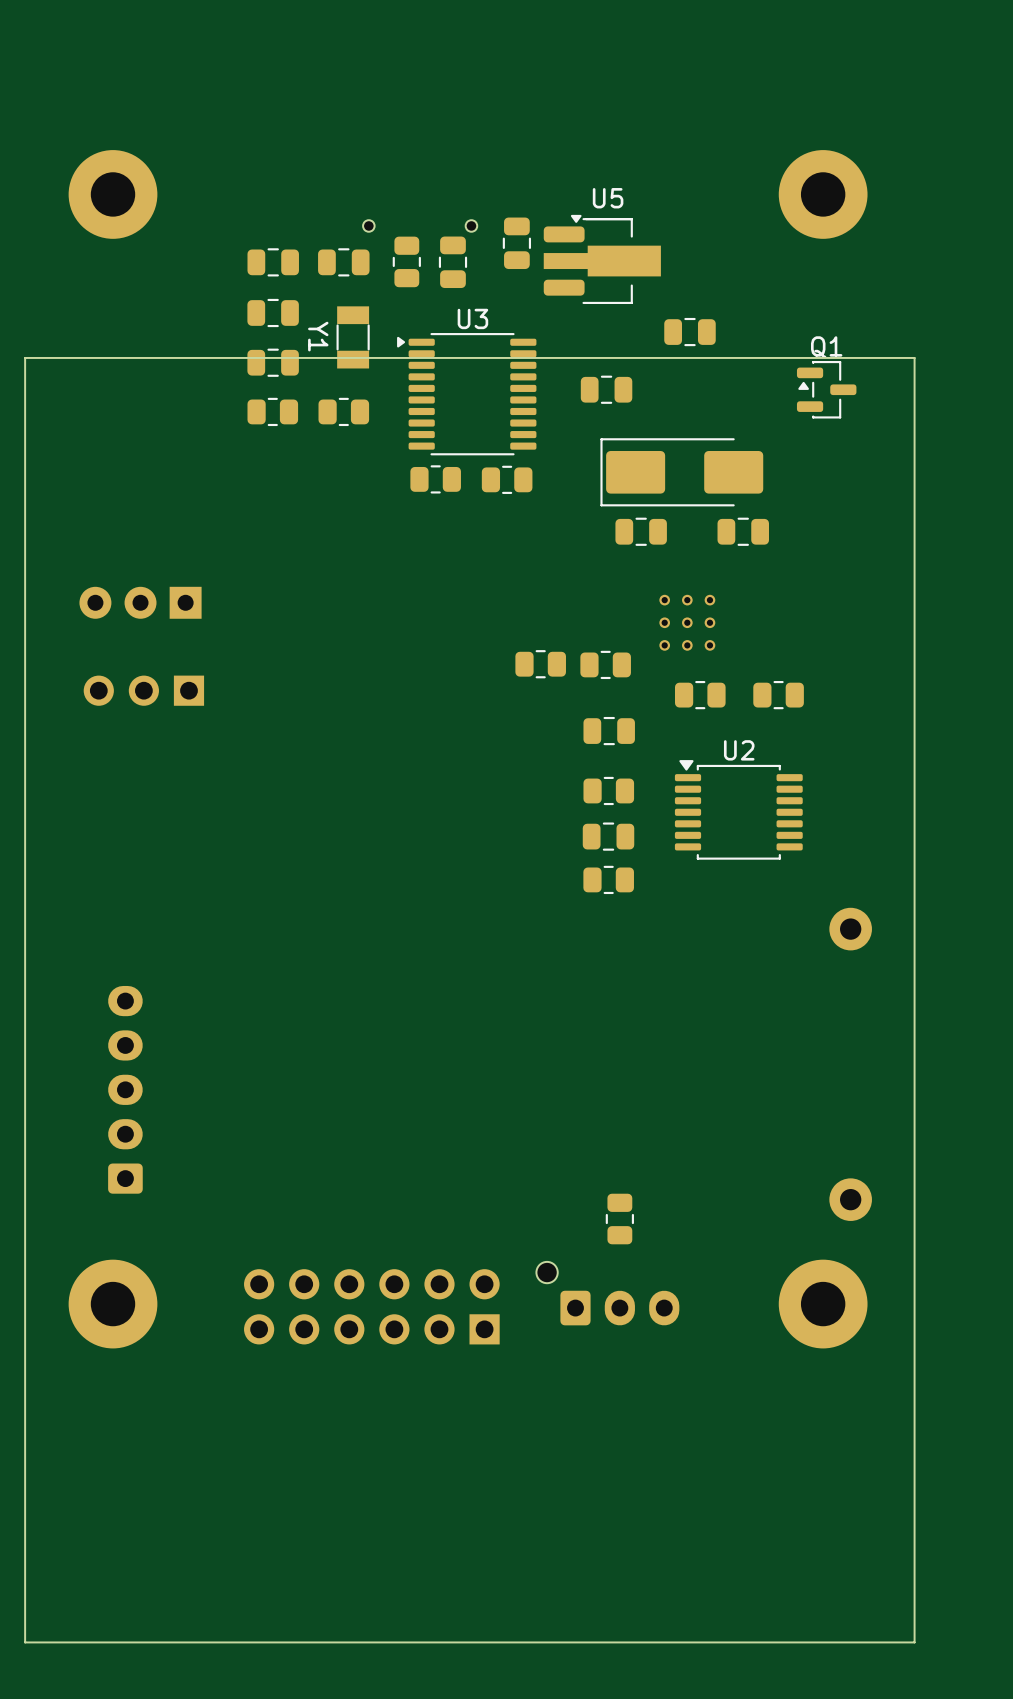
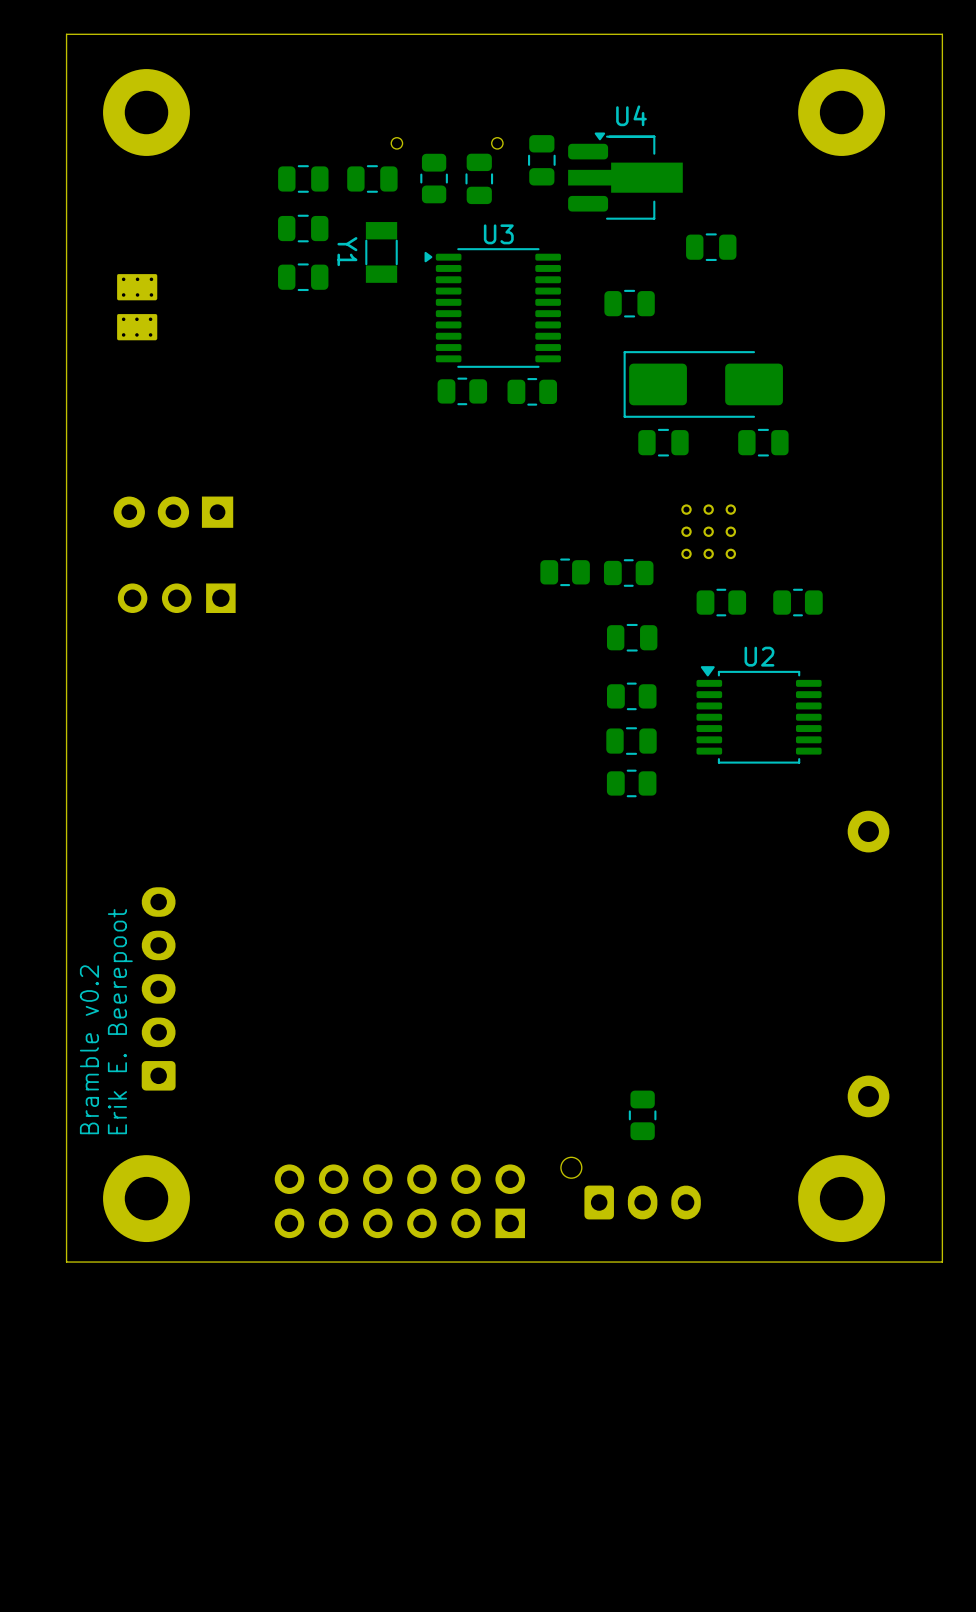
U5 name: U5 (608, 198) -> U4 (631, 115)
board edge: (914, 357) (25, 357) (25, 1642) (914, 1642) (914, 357) -> (942, 34) (942, 1262) (66, 1262) (66, 34) (942, 34)
Q1: (826, 389) -> none
part: none -> (137, 307)
part: (272, 411) -> none
part: (343, 411) -> none
text: none -> Erik E. Beerepoot (120, 1021)
text: none -> Bramble v0.2 (89, 1049)

